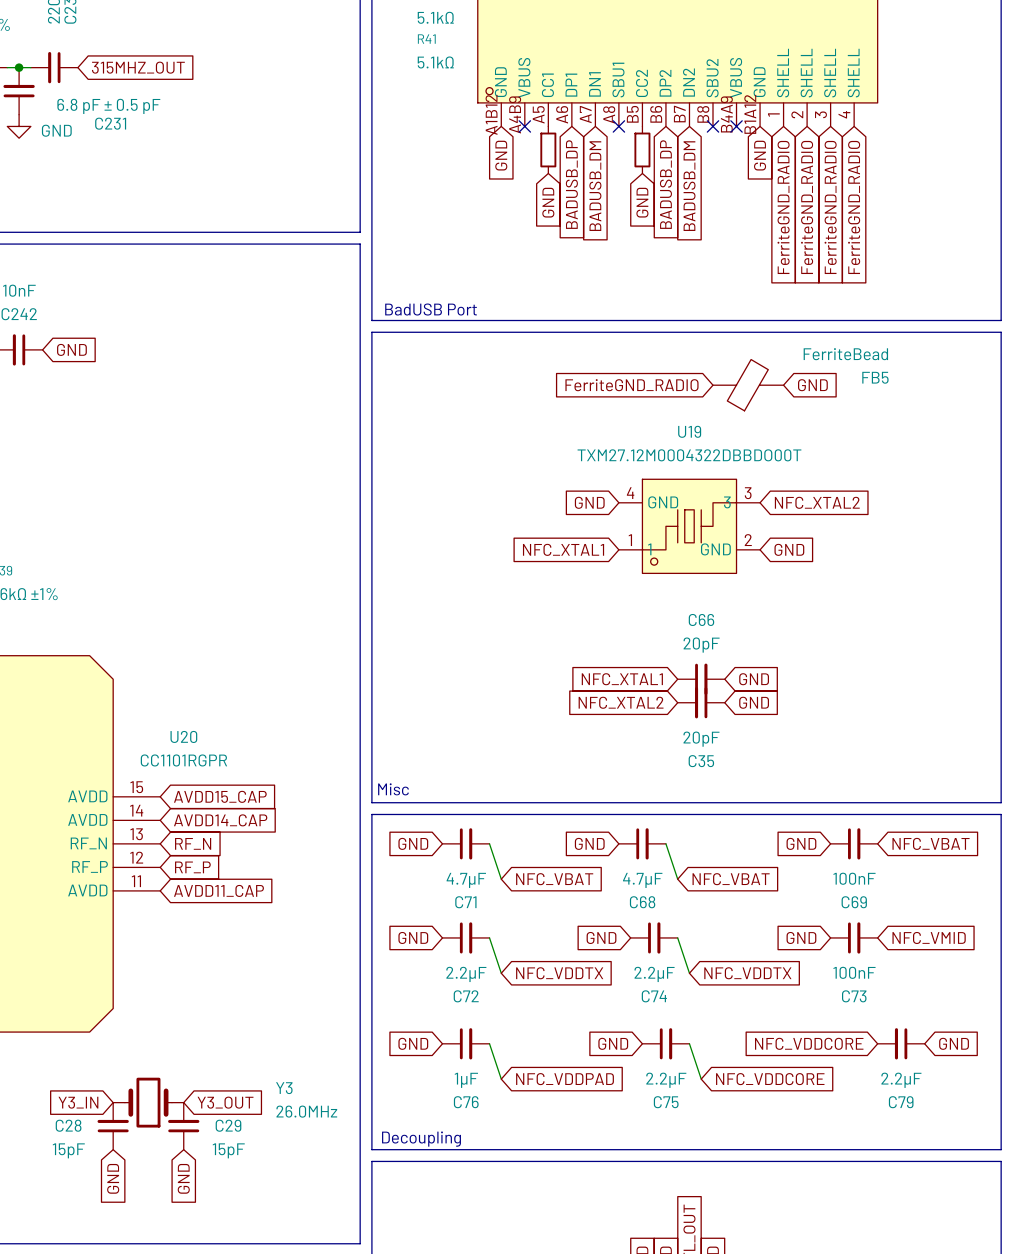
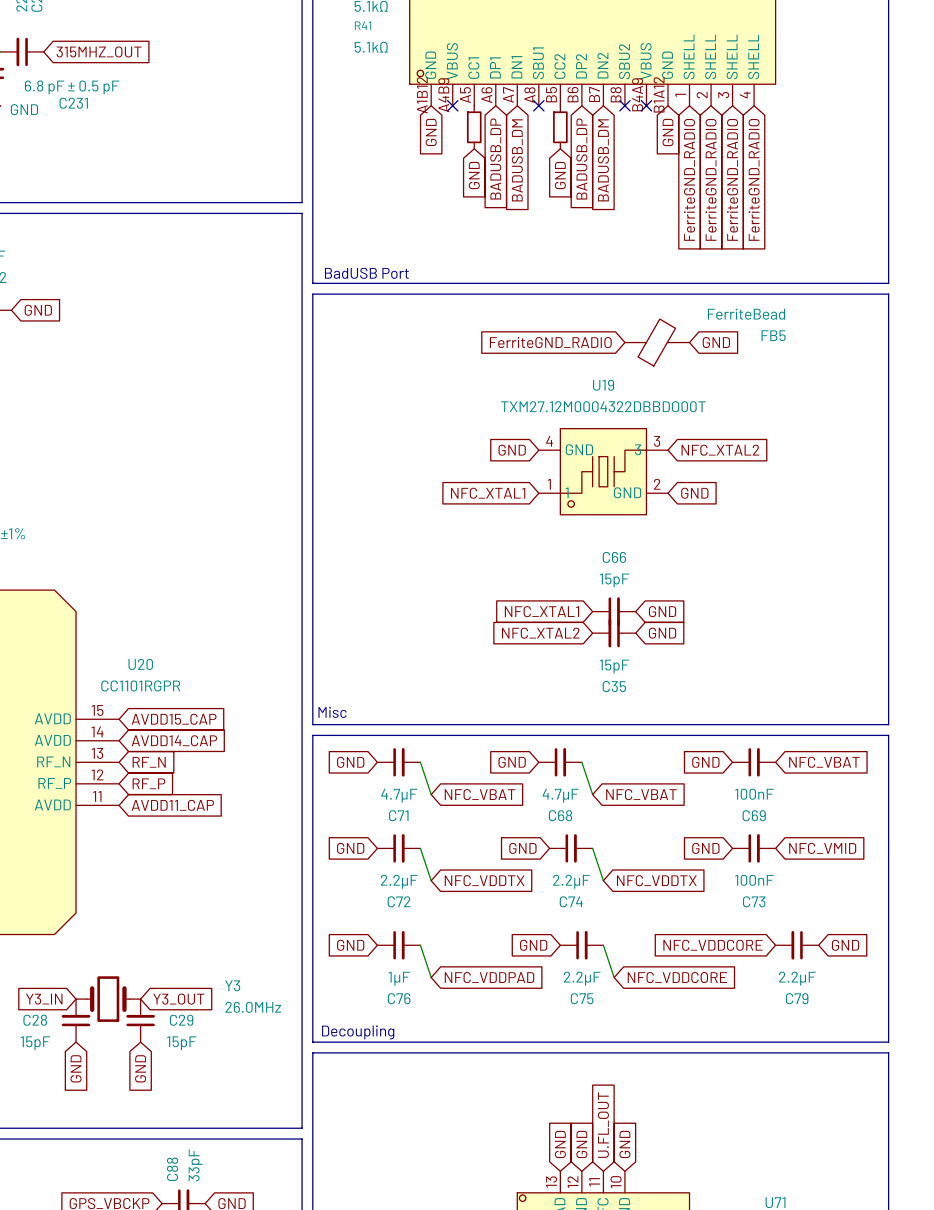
C66 value: 20pF (701, 645) -> 15pF (614, 580)
C35 value: 20pF (701, 739) -> 15pF (614, 666)

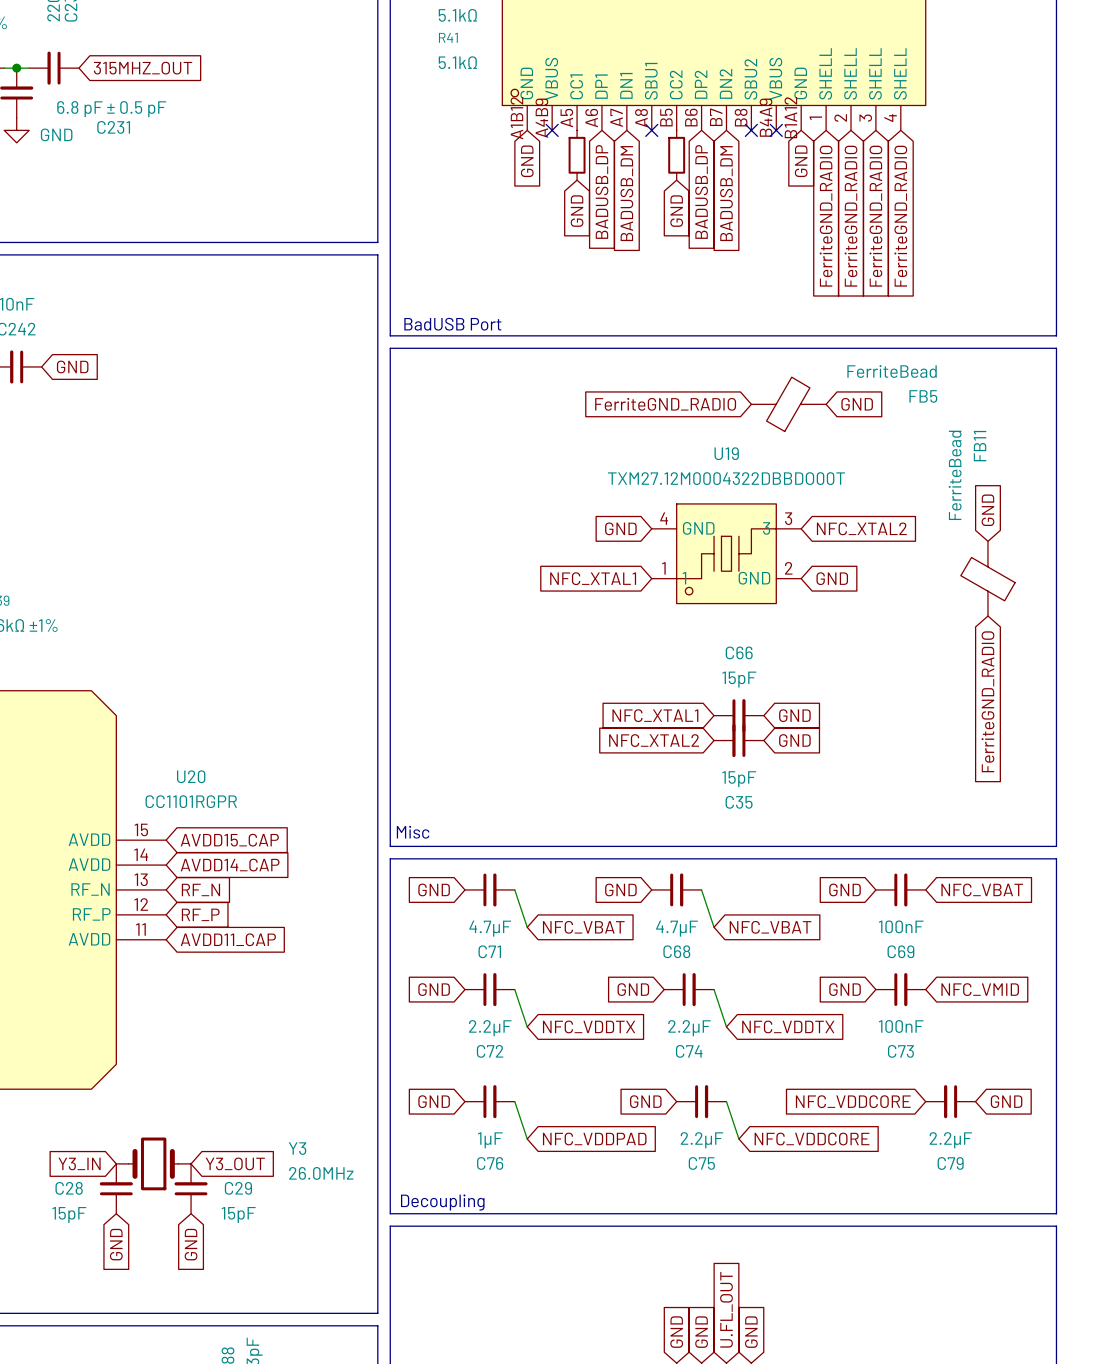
global label: none -> GND (987, 510)
FB11: none -> FerriteBead (987, 578)
global label: none -> FerriteGND_RADIO (987, 701)

